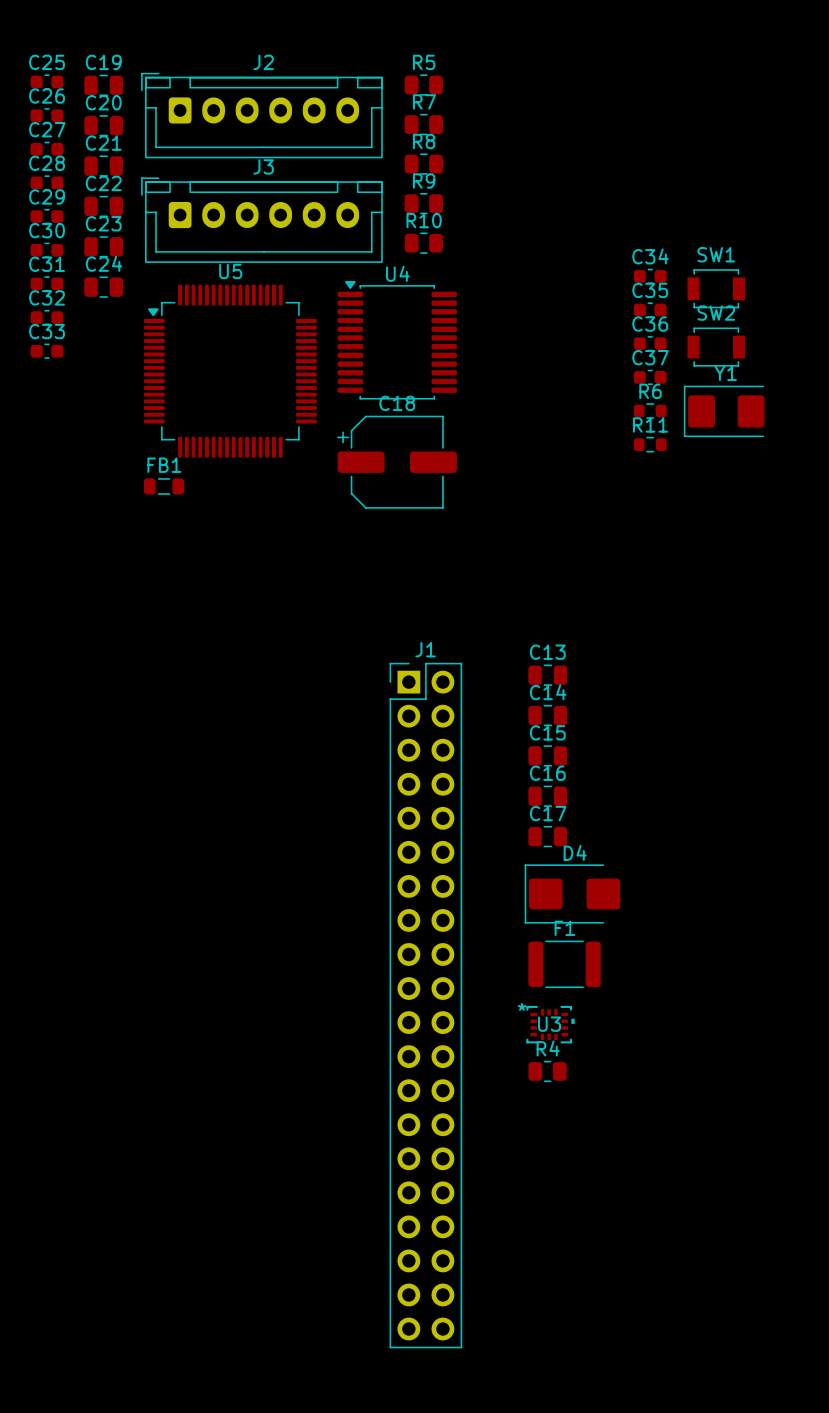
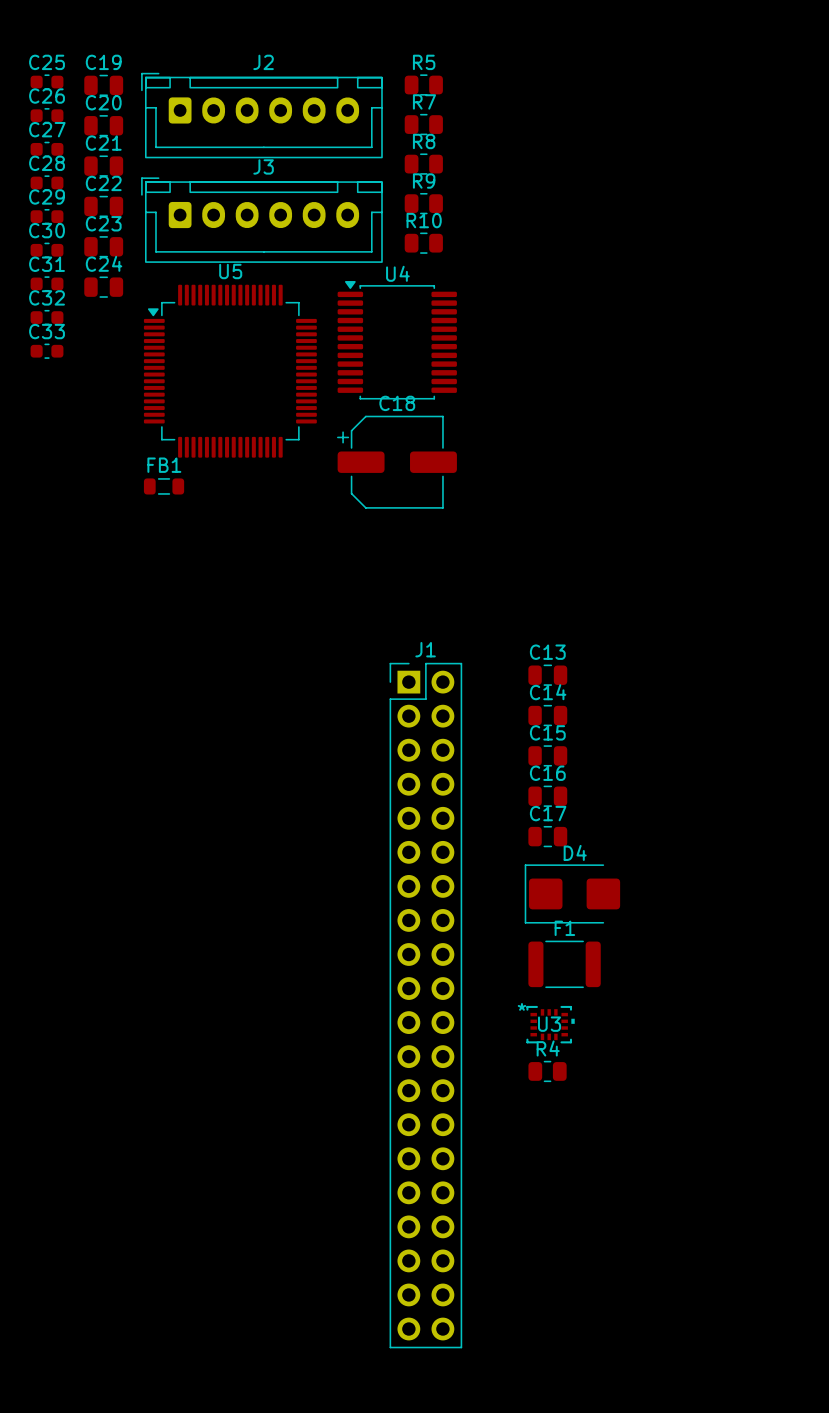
C34: (650, 276) -> none
SW1: (716, 288) -> none
C35: (650, 310) -> none
C36: (650, 343) -> none
SW2: (716, 347) -> none
C37: (650, 377) -> none
R6: (650, 411) -> none
Y1: (724, 411) -> none
R11: (650, 444) -> none

